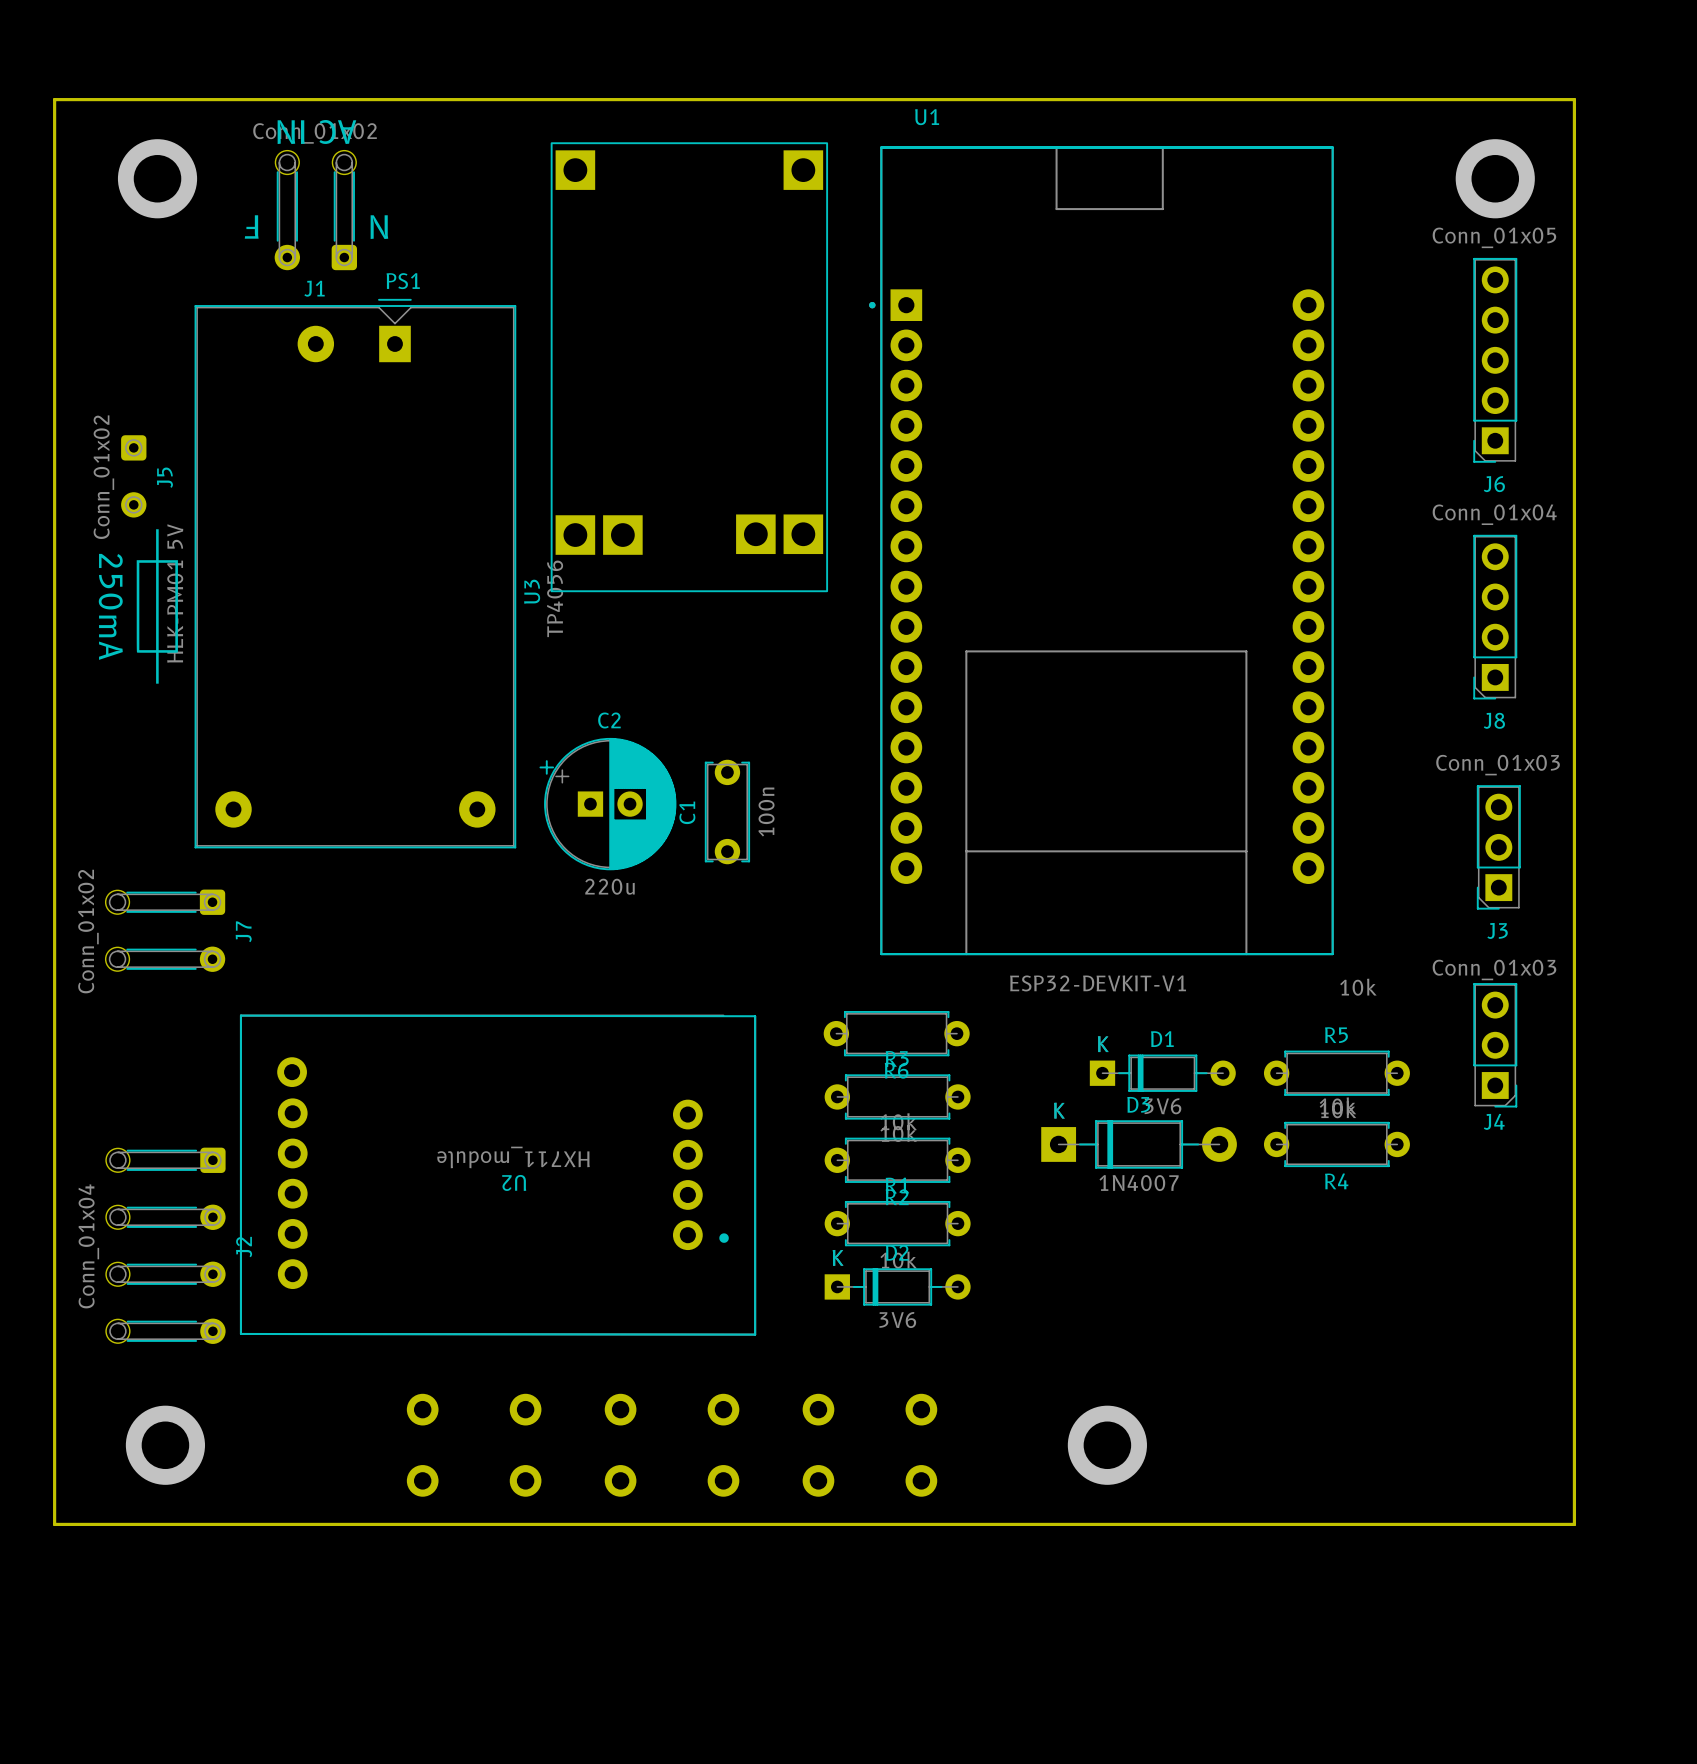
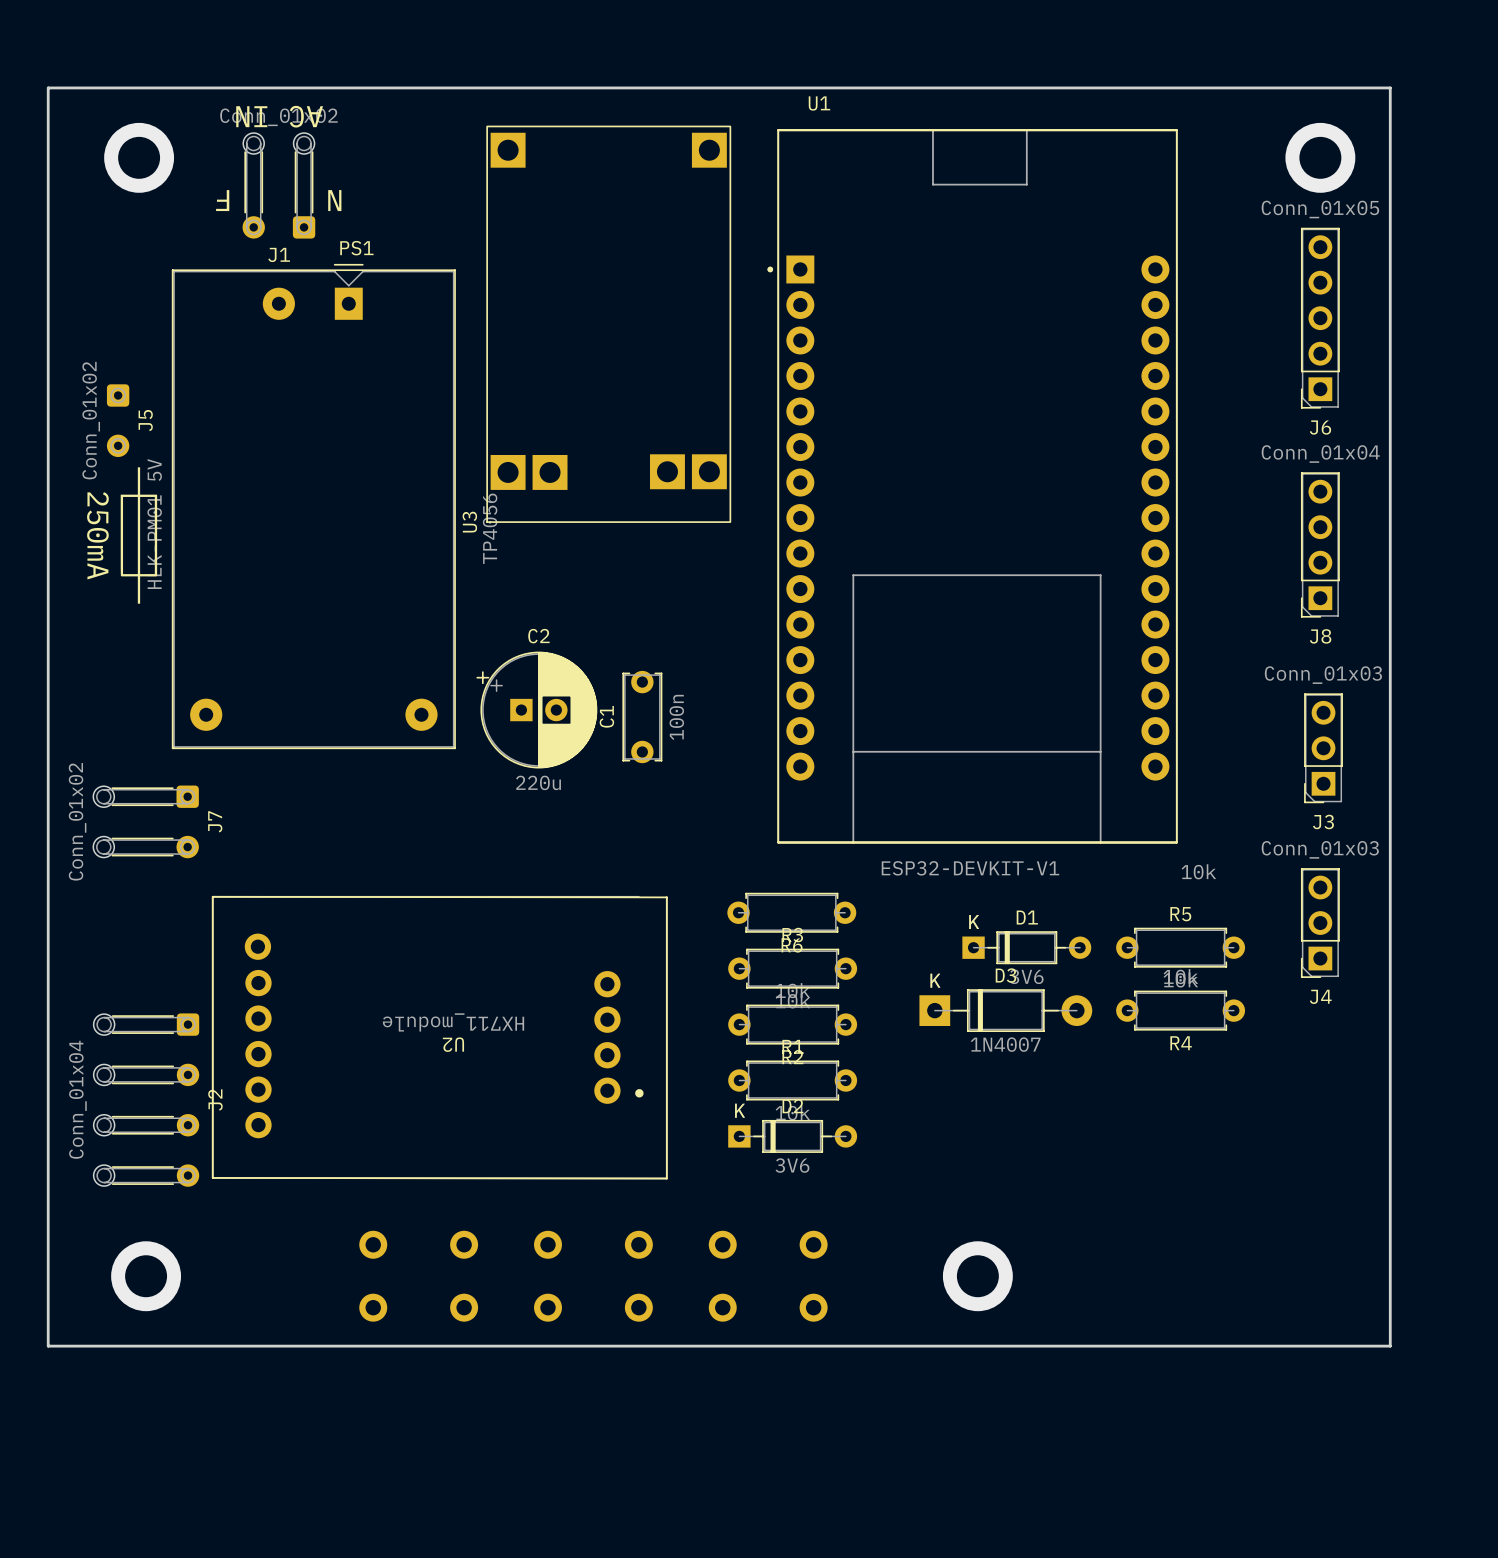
J4 footprint: [1473, 983, 1518, 1108] -> [1300, 868, 1340, 978]

